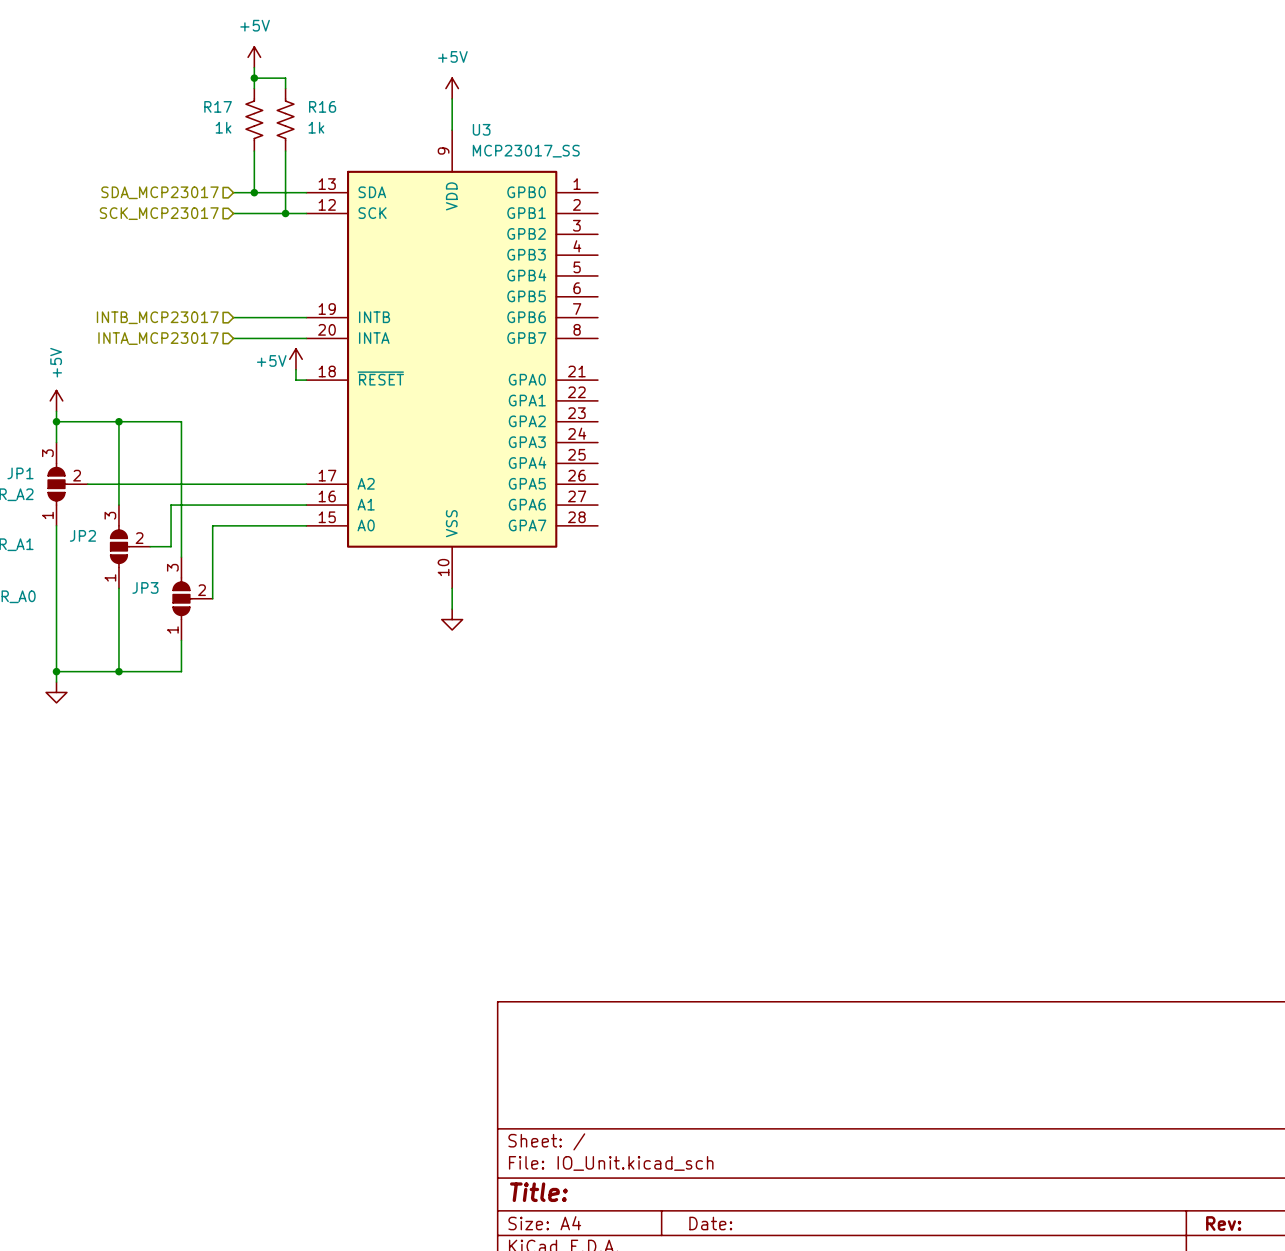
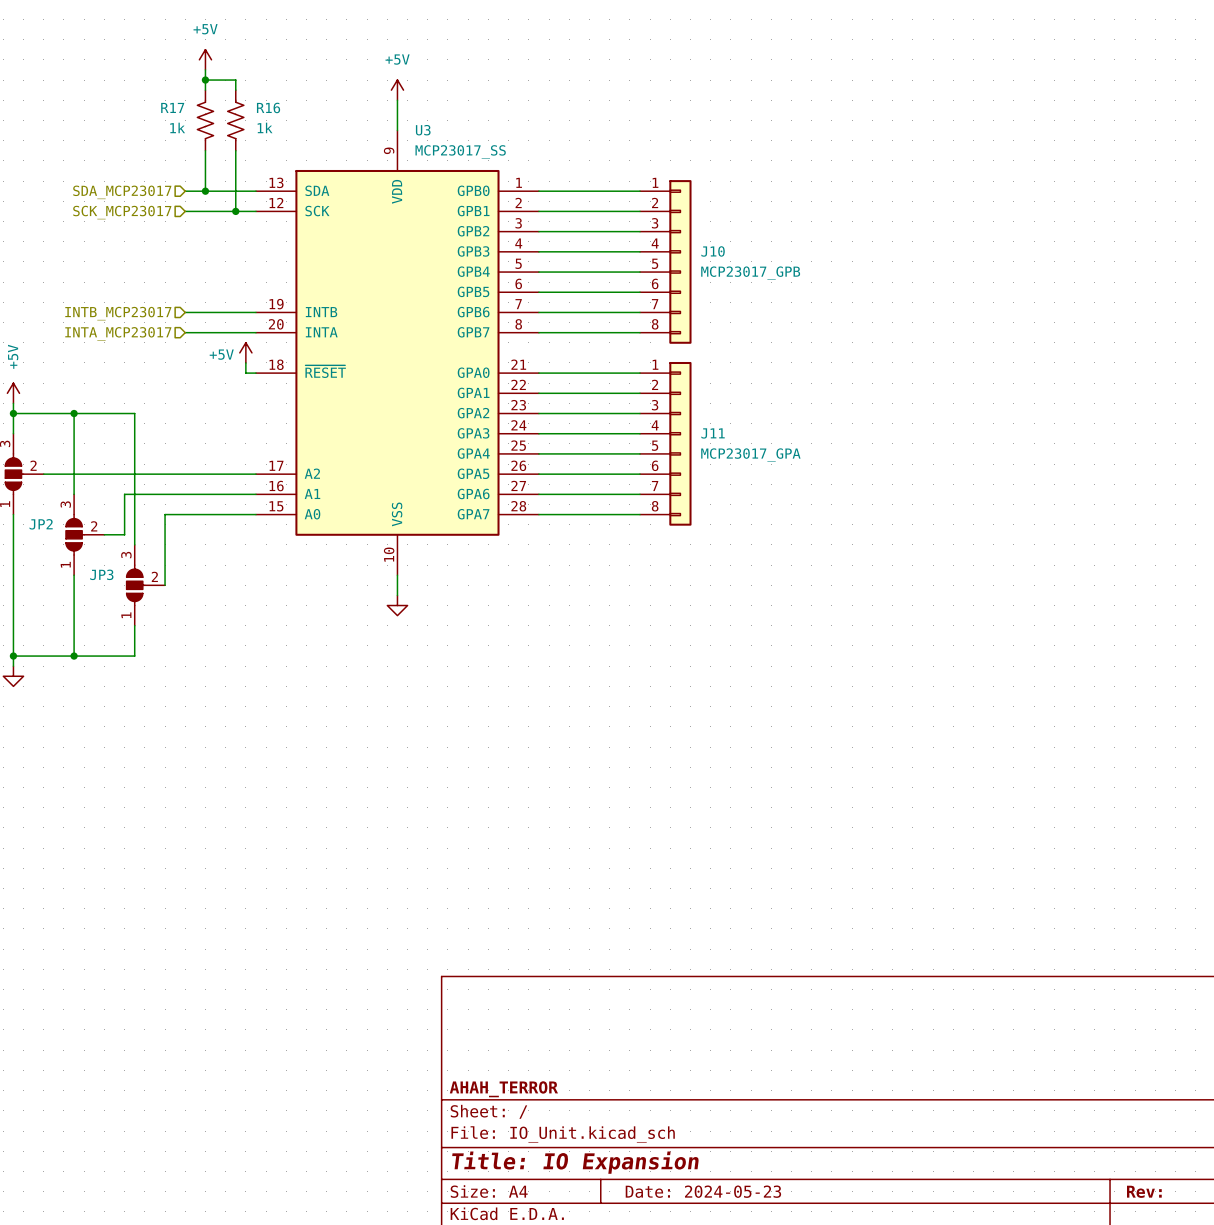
wire: none -> (538, 191) (639, 191)
wire: none -> (538, 211) (639, 211)
wire: none -> (538, 231) (639, 231)
wire: none -> (538, 251) (639, 251)
J10: none -> MCP23017_GPB (665, 261)
wire: none -> (538, 272) (639, 272)
wire: none -> (538, 292) (639, 292)
wire: none -> (538, 312) (639, 312)
wire: none -> (538, 332) (639, 332)
wire: none -> (538, 373) (639, 373)
wire: none -> (538, 393) (639, 393)
wire: none -> (538, 413) (639, 413)
wire: none -> (538, 433) (639, 433)
J11: none -> MCP23017_GPA (665, 443)
wire: none -> (538, 453) (639, 453)
wire: none -> (538, 474) (639, 474)
wire: none -> (538, 494) (639, 494)
wire: none -> (538, 514) (639, 514)
title block: none -> AHAH_TERROR (503, 1089)
title block: Title: (538, 1192) -> Title: IO Expansion (575, 1162)
title block: Date: (710, 1223) -> Date: 2024-05-23 (703, 1191)

